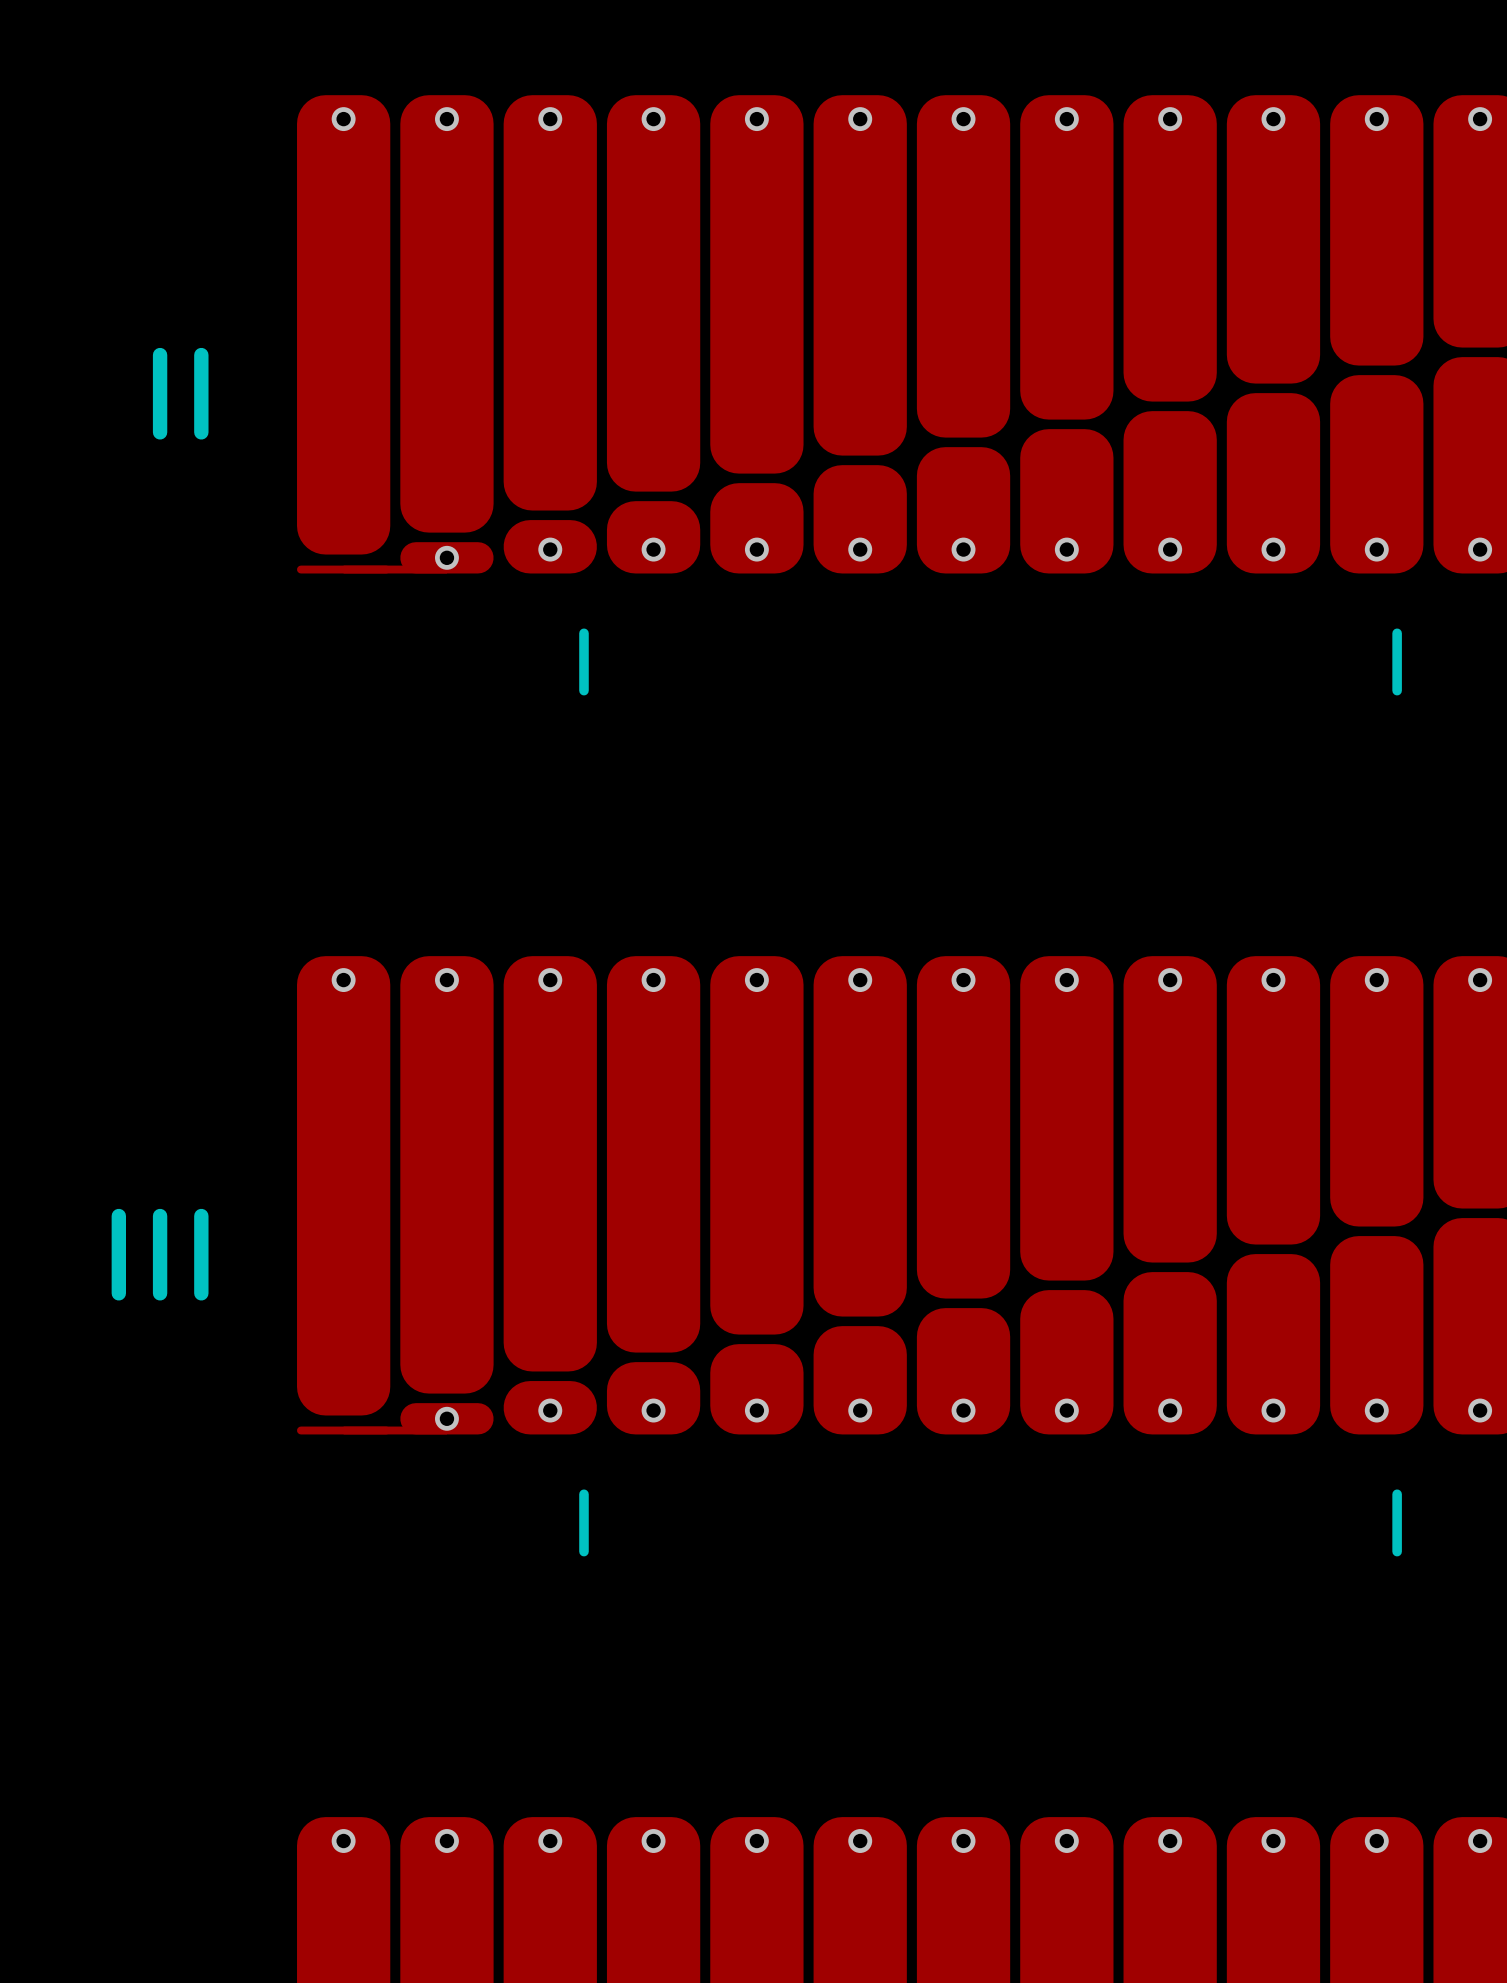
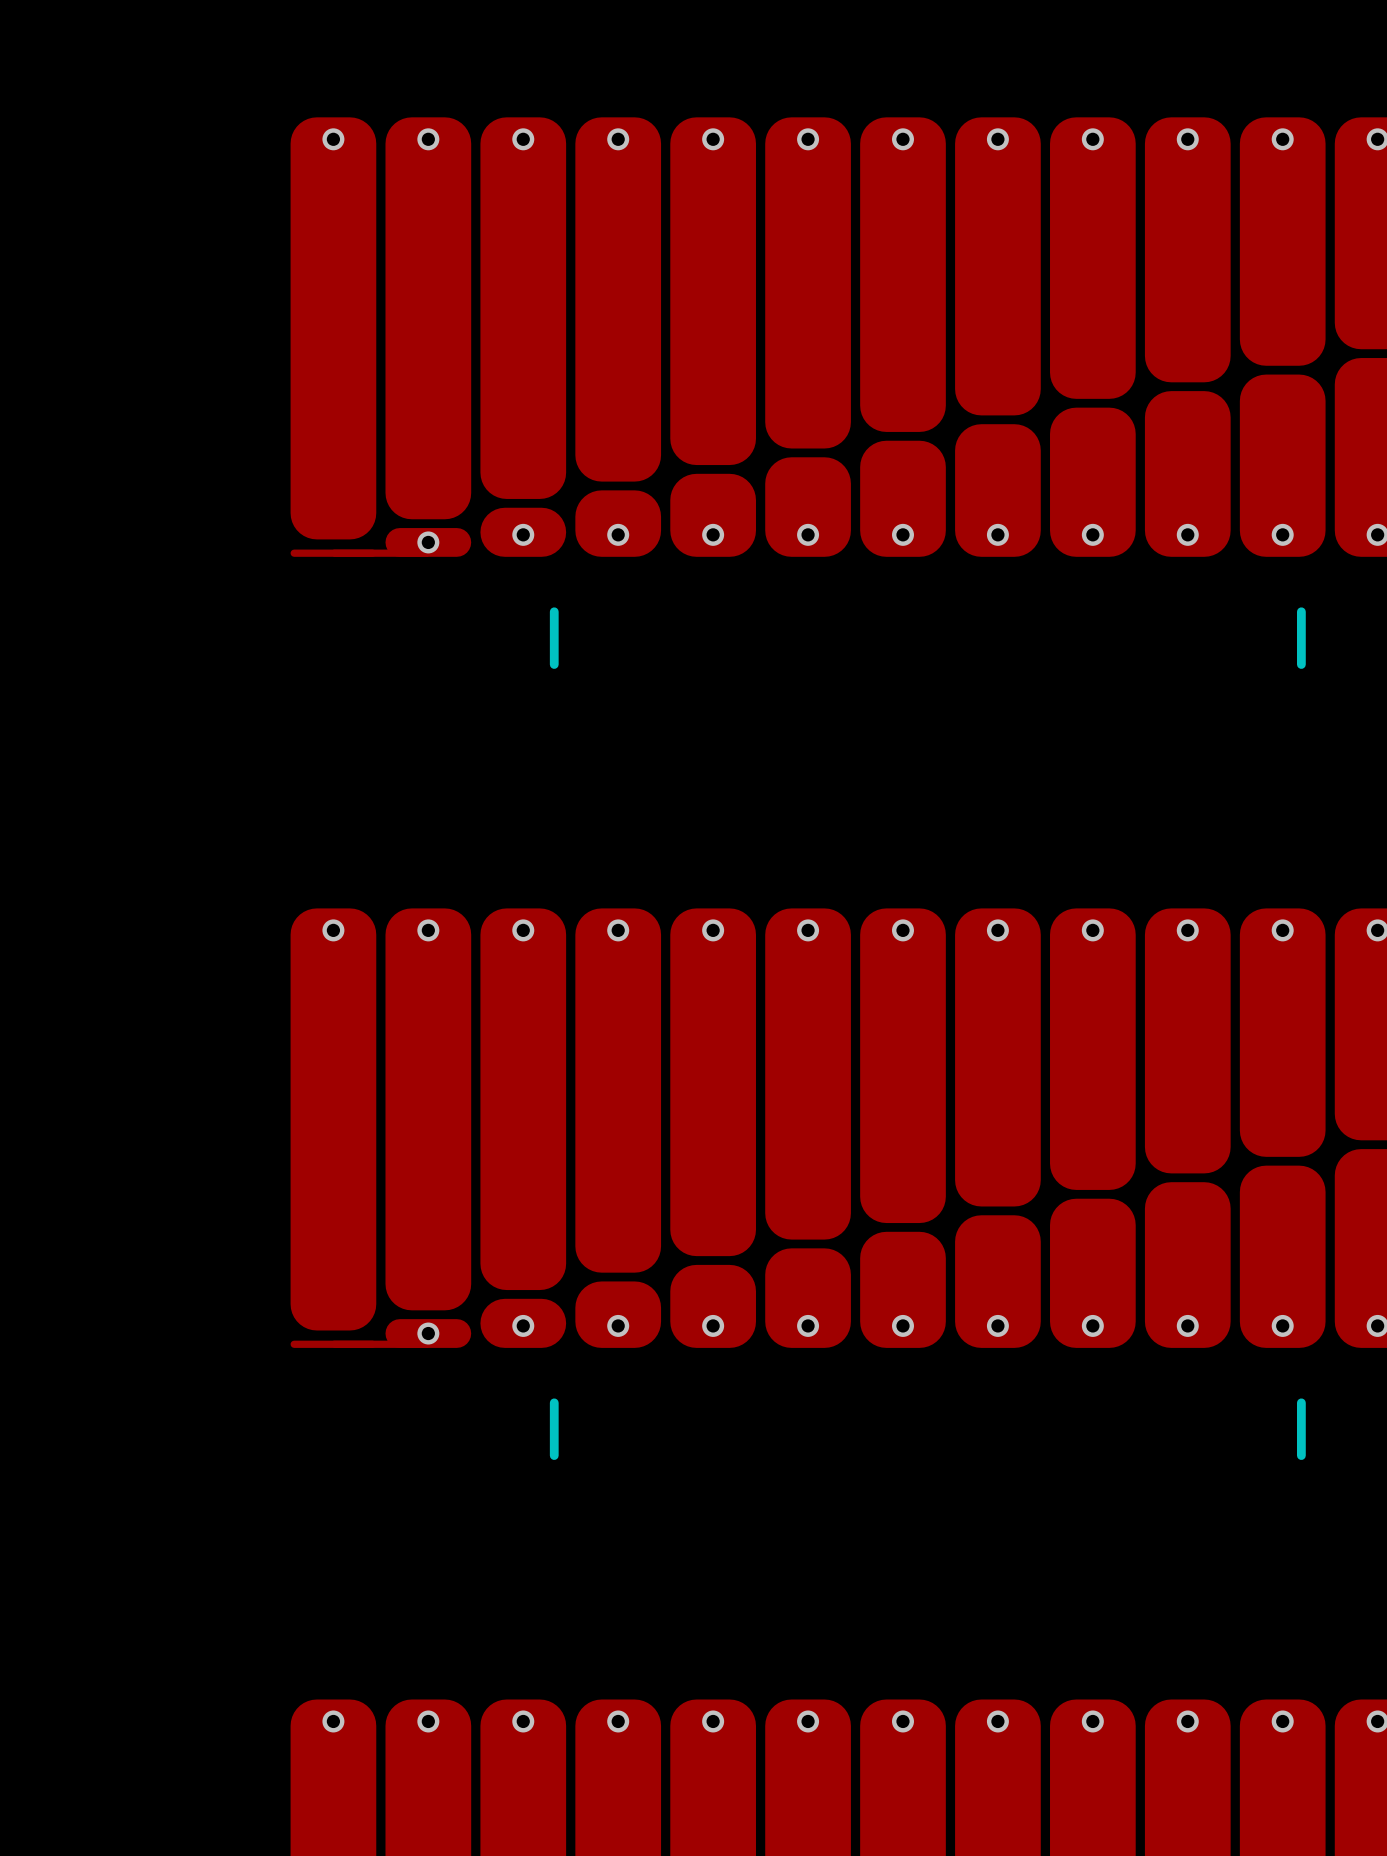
line: (160, 355) (160, 432) -> none
line: (201, 355) (201, 432) -> none
line: (118, 1216) (118, 1293) -> none
line: (160, 1216) (160, 1293) -> none
line: (201, 1216) (201, 1293) -> none

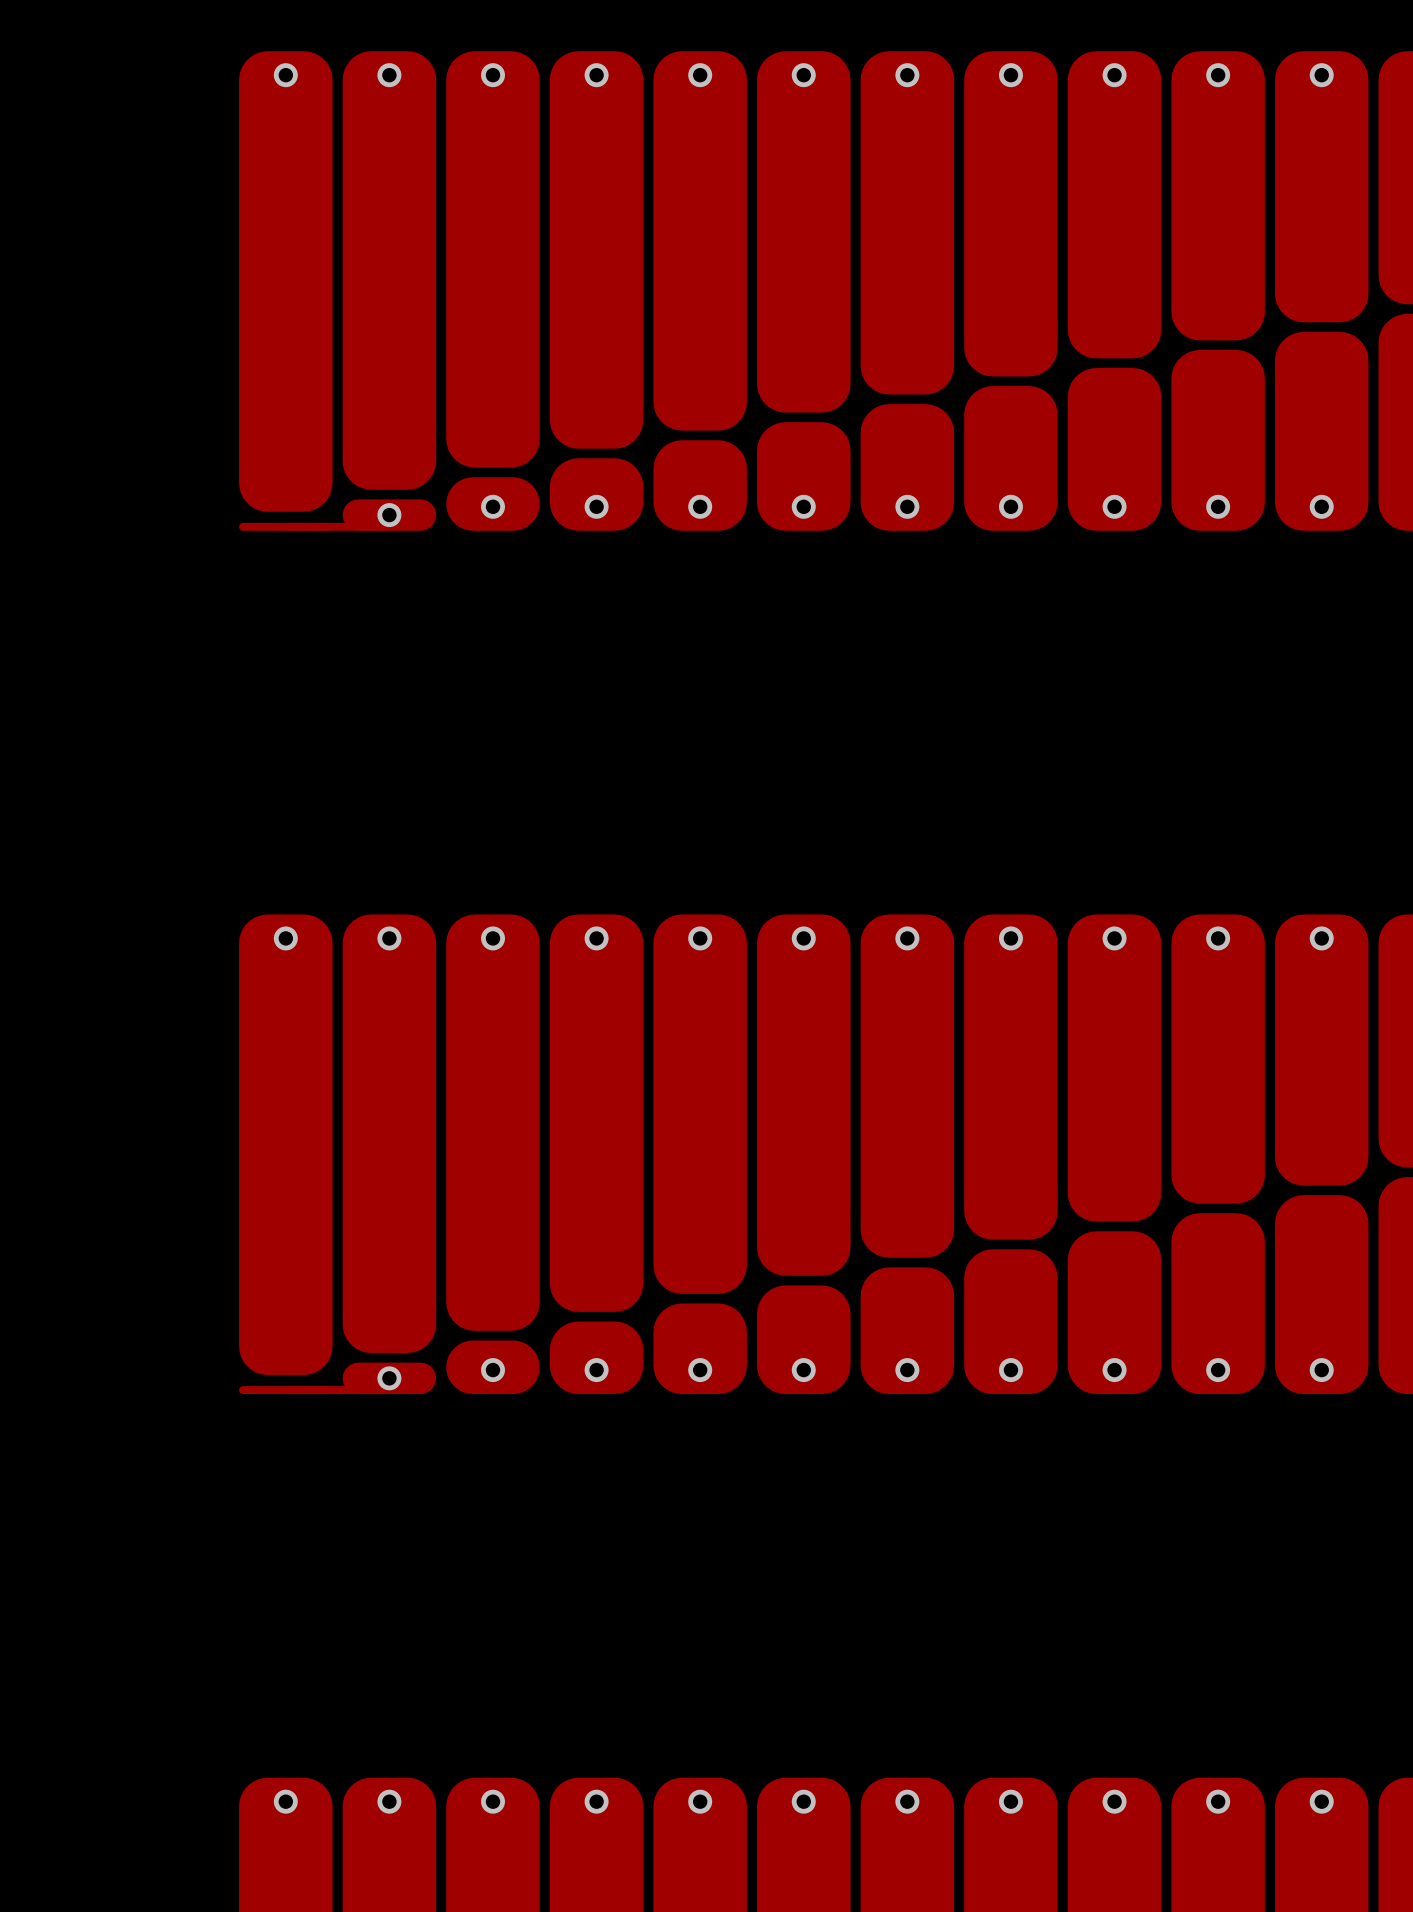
line: (554, 611) (554, 664) -> none
line: (1301, 611) (1301, 664) -> none
line: (554, 1402) (554, 1455) -> none
line: (1301, 1402) (1301, 1455) -> none

